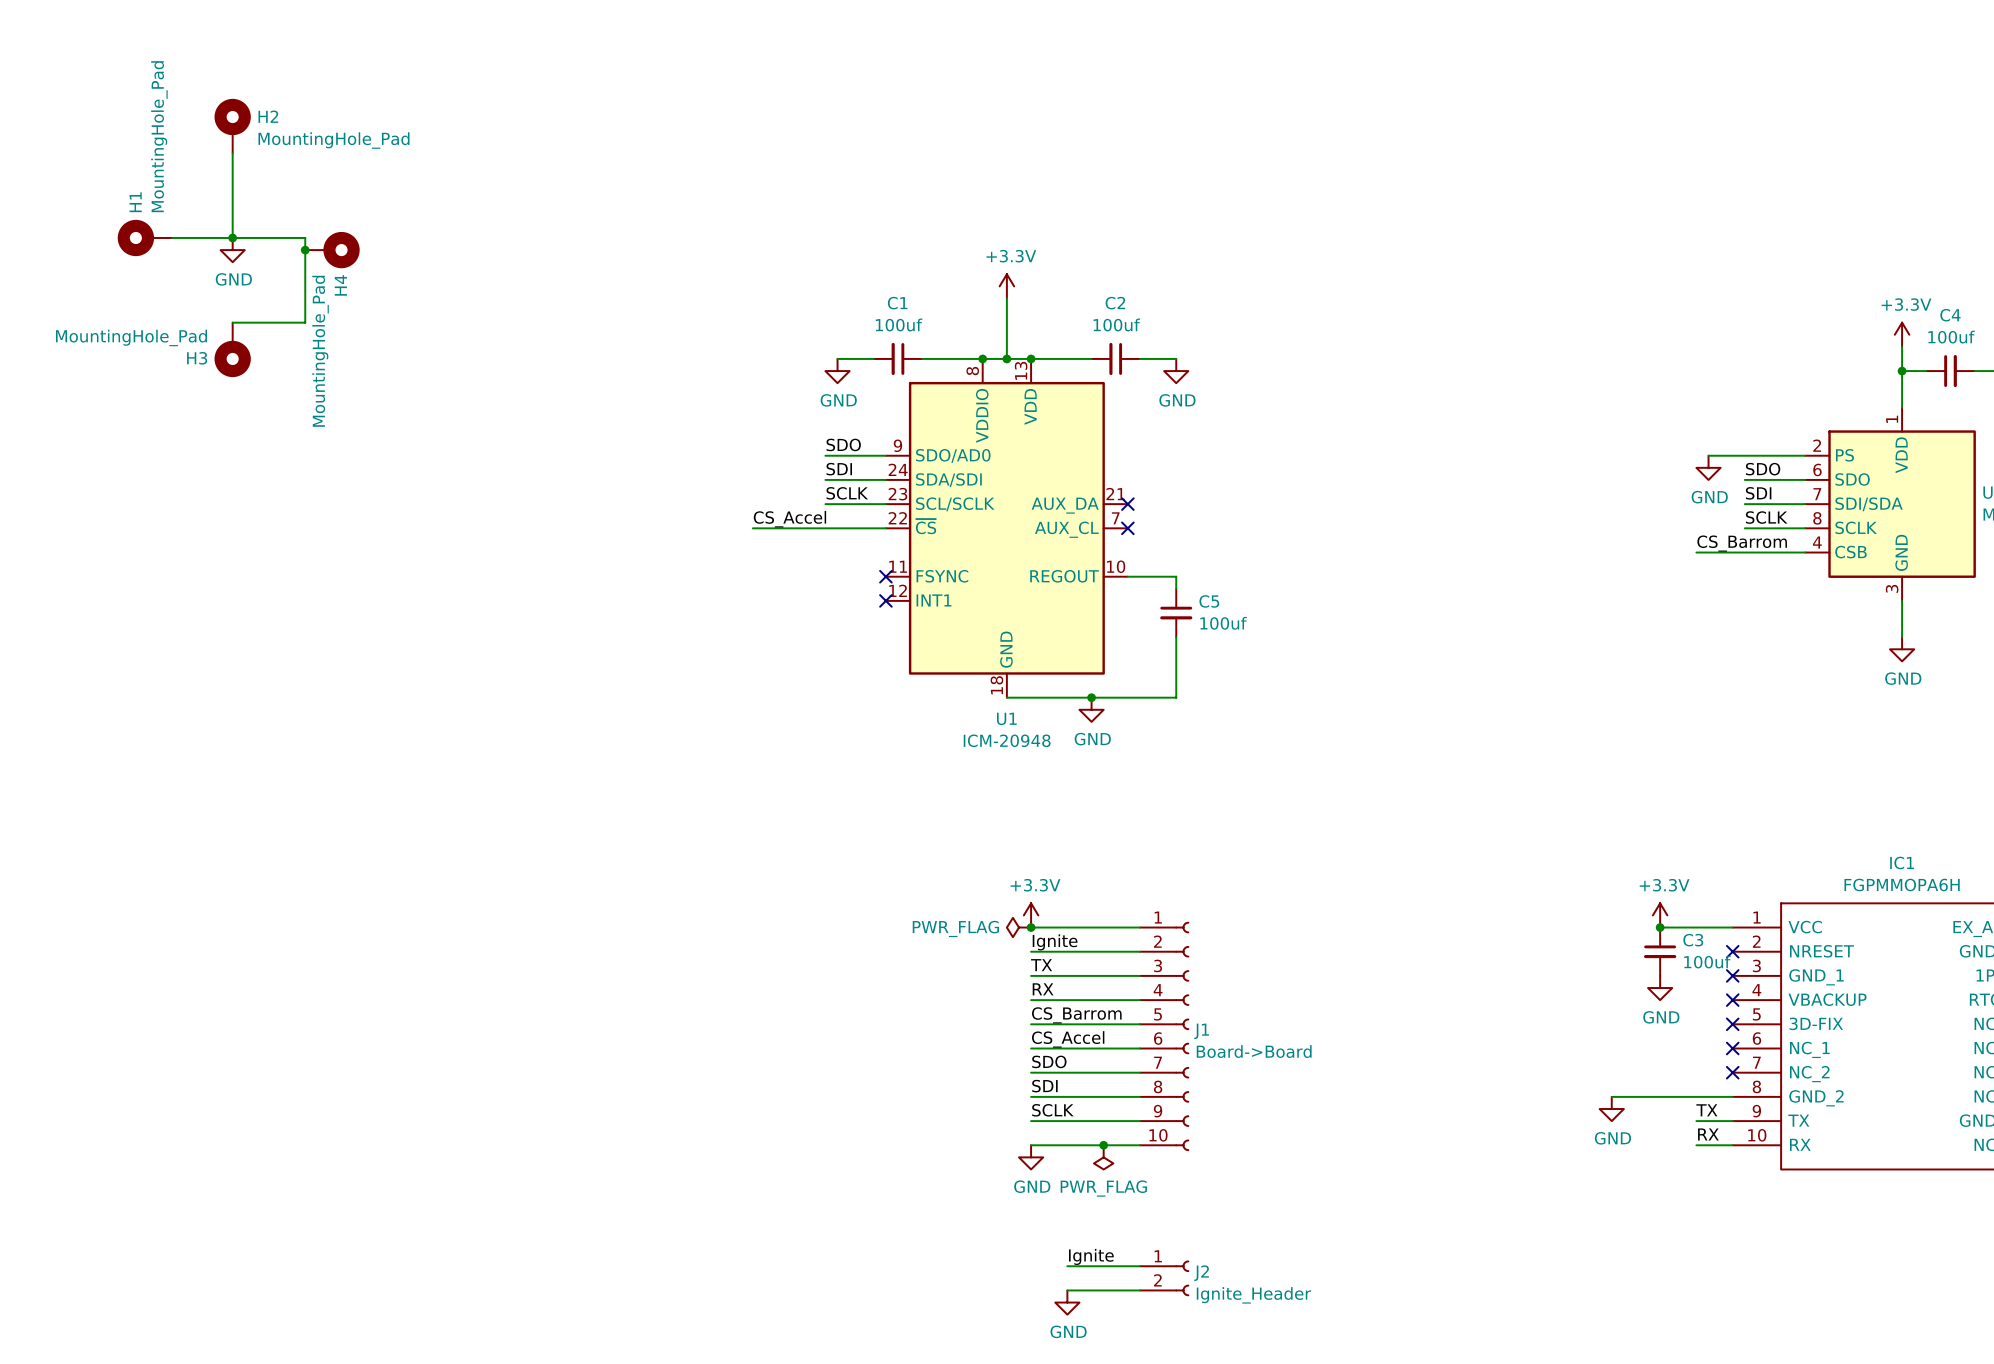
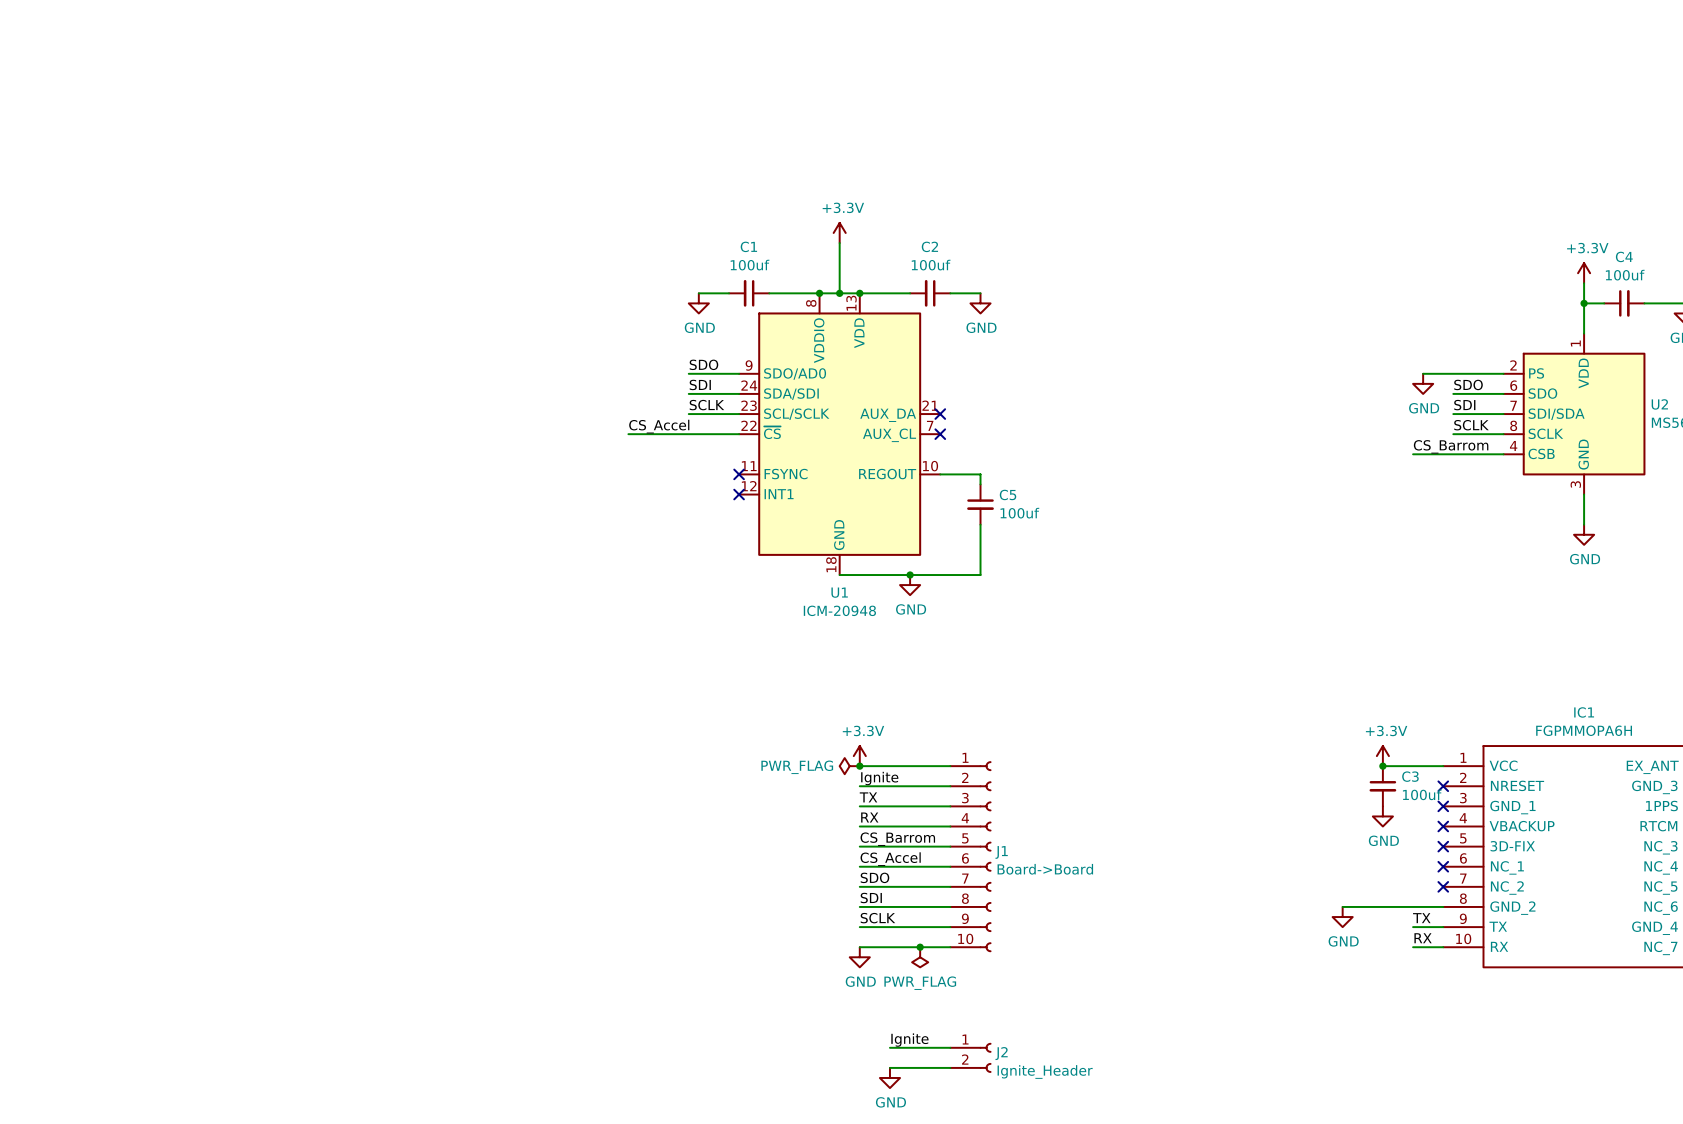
H2: MountingHole_Pad (232, 126) -> none
wire: (232, 153) (232, 237) -> none
H1: MountingHole_Pad (144, 237) -> none
wire: (172, 237) (305, 237) (305, 322) (232, 322) -> none
junction: (232, 237) -> none
power symbol: GND (232, 250) -> none
junction: (305, 250) -> none
H4: MountingHole_Pad (332, 250) -> none
H3: MountingHole_Pad (232, 349) -> none

